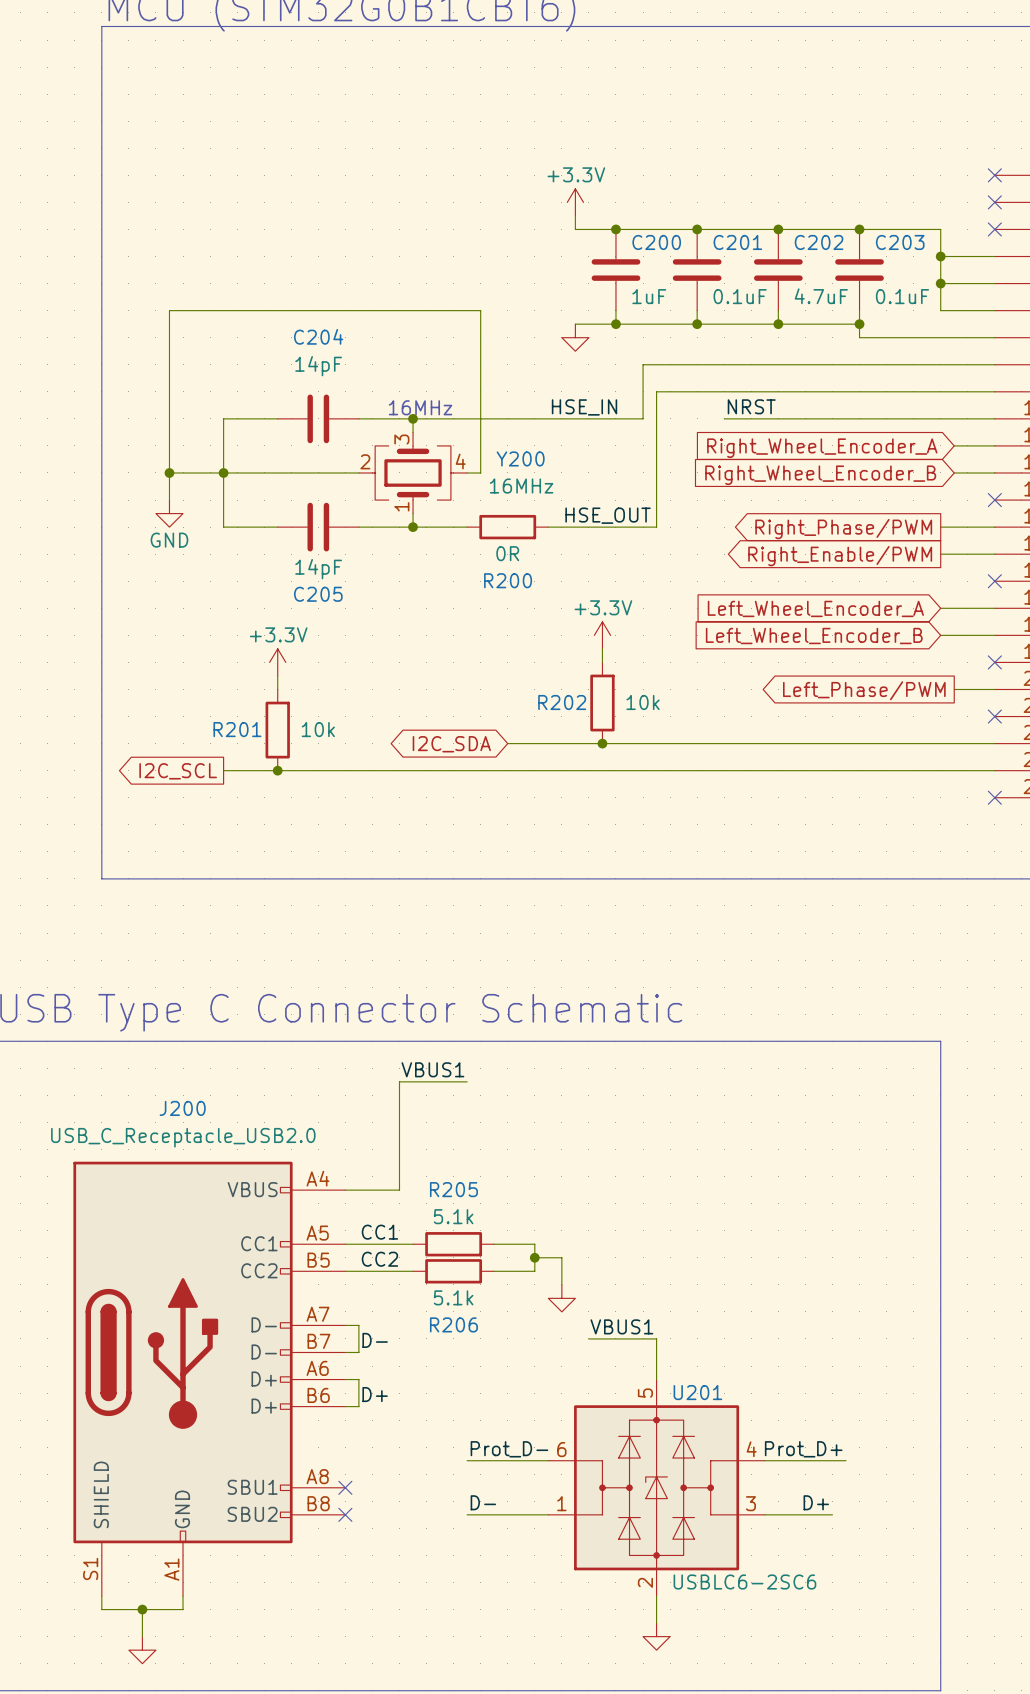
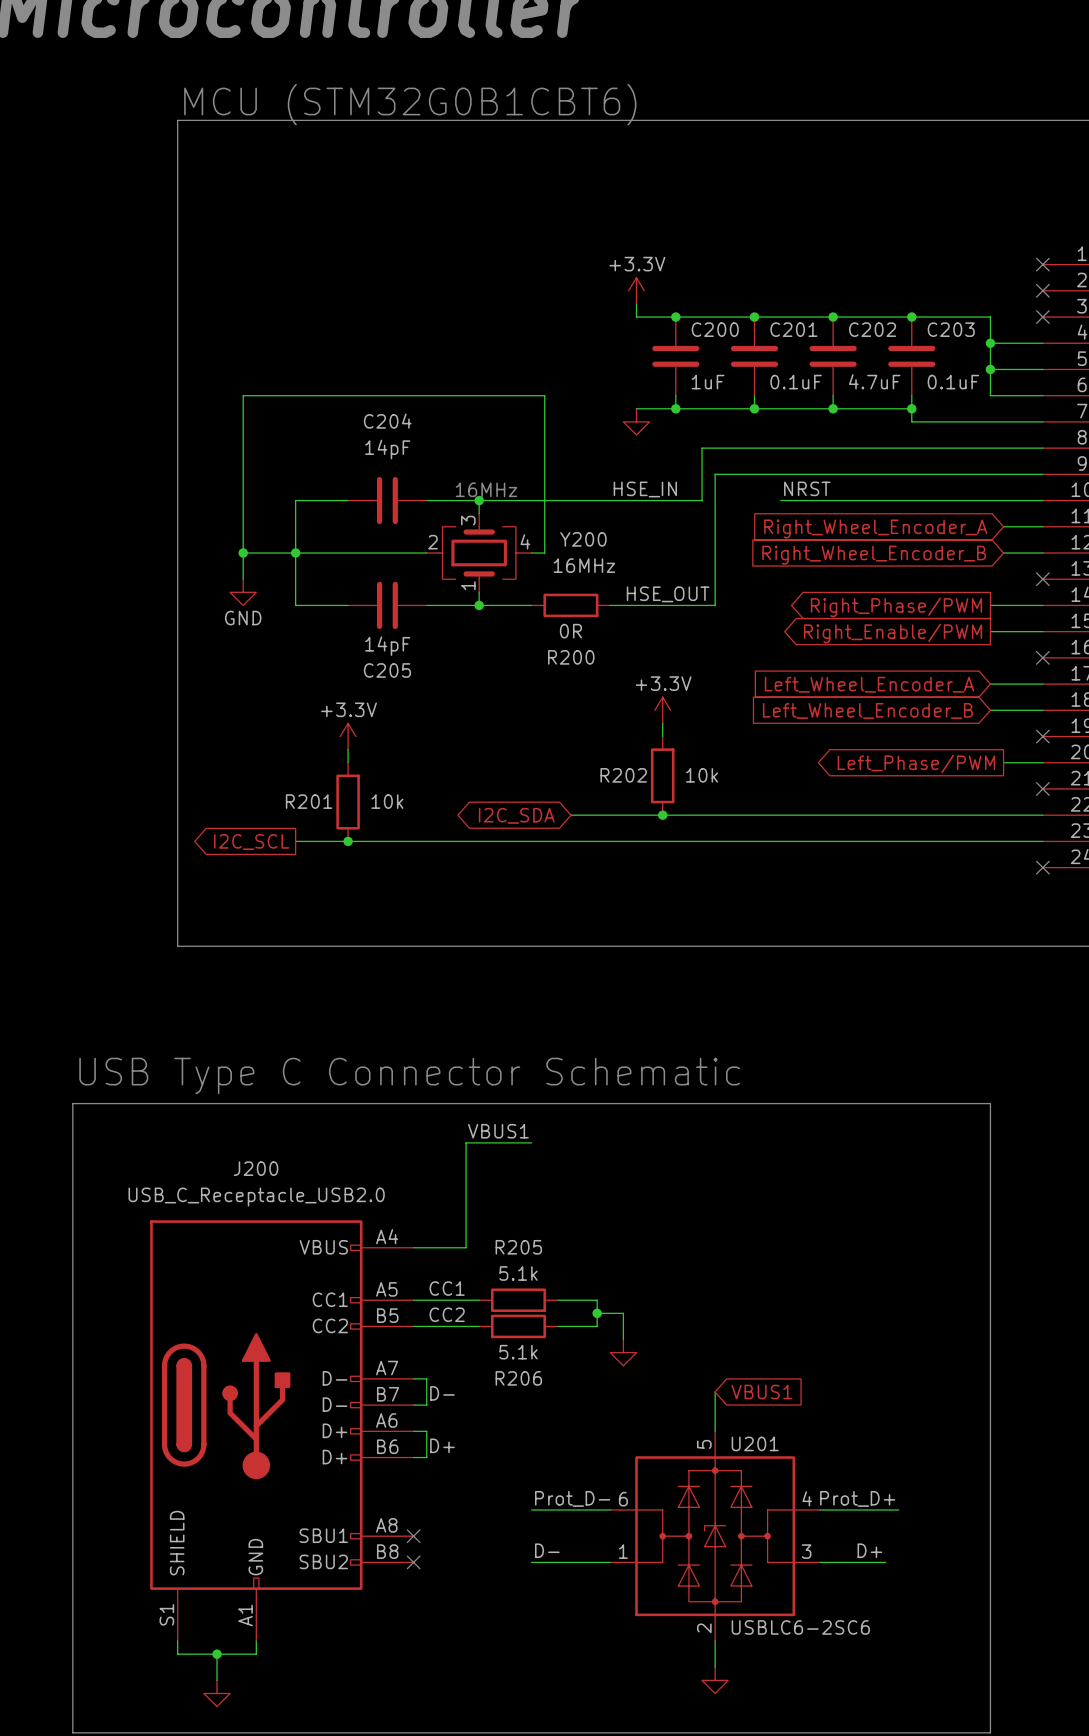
label: VBUS1 (621, 1326) -> none
wire: (588, 1338) (656, 1338) -> none
global label: none -> VBUS1 (761, 1391)

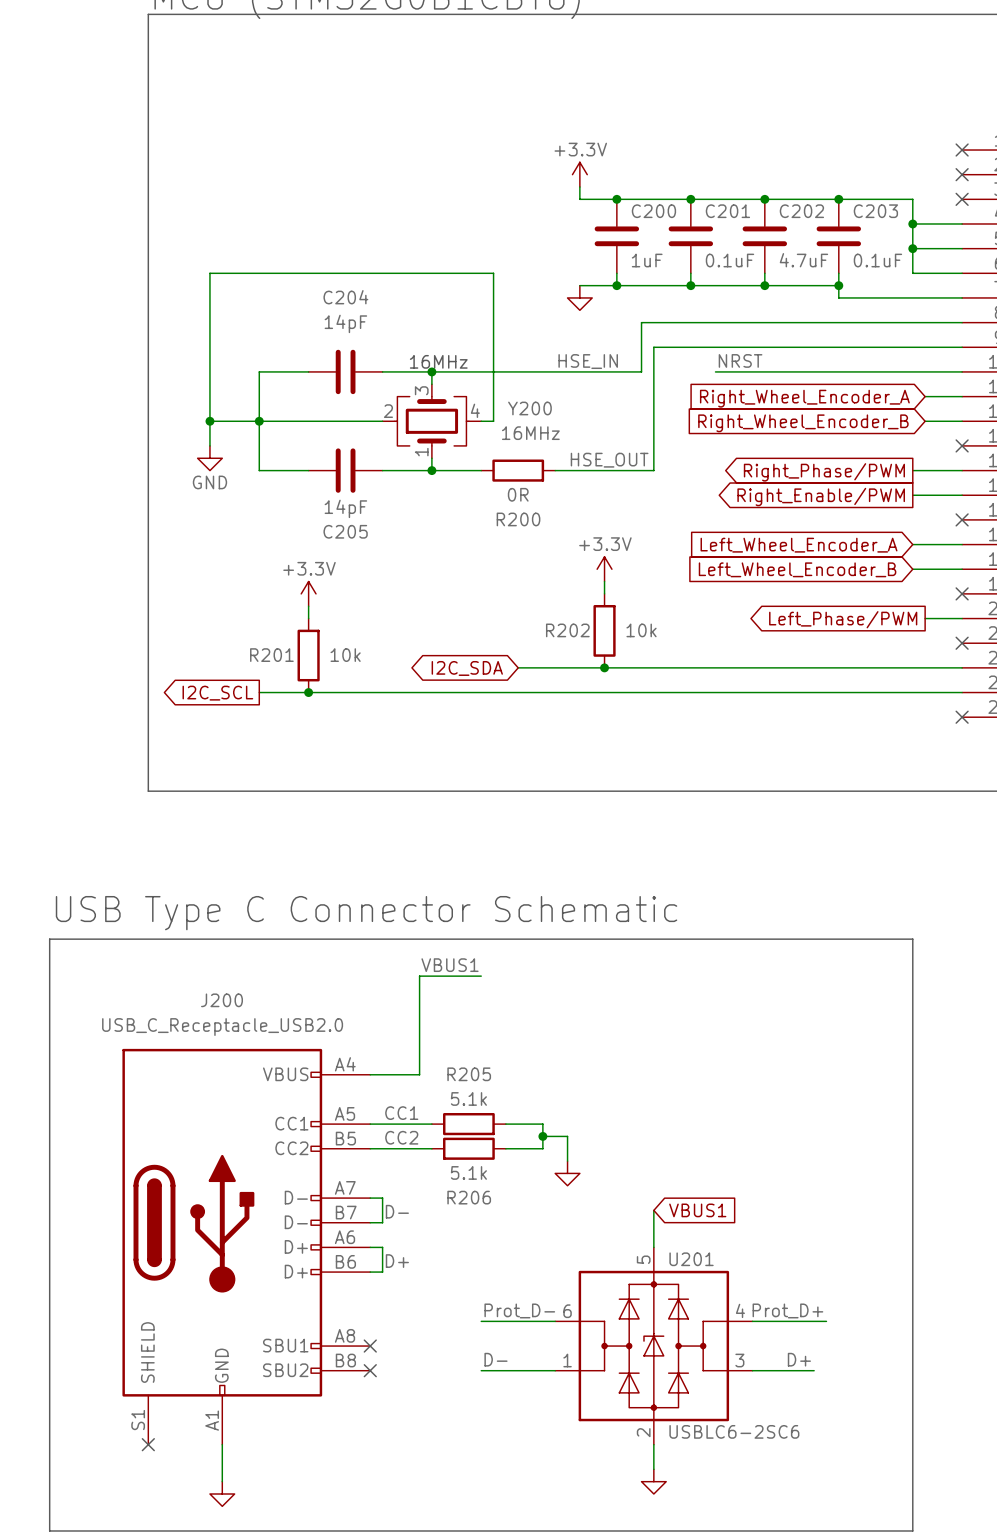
wire: (177, 1641) (177, 1654) (256, 1654) -> (222, 1481) (222, 1457)
no-connect mark: none -> (148, 1444)
wire: (216, 1654) (216, 1680) -> none
junction: (216, 1654) -> none
power symbol position: (216, 1693) -> (222, 1494)

